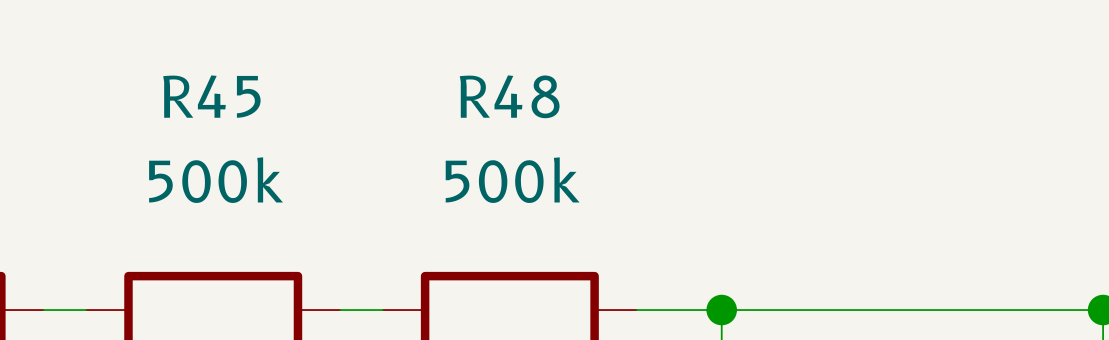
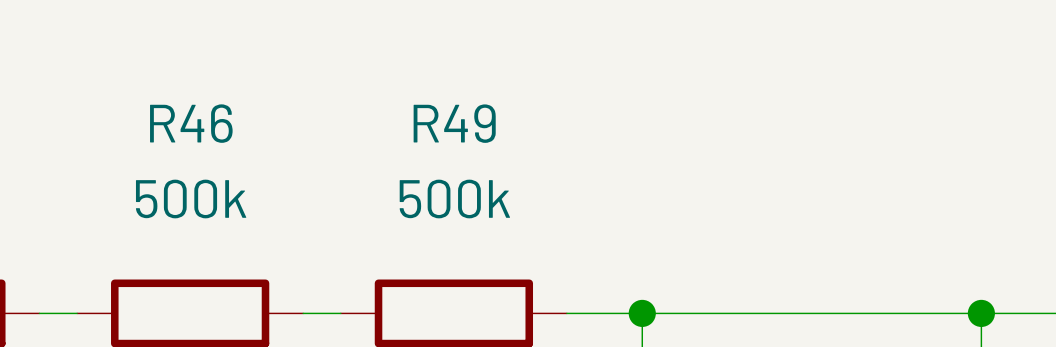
R45 name: R45 (211, 96) -> R46 (191, 123)
R48 name: R48 (509, 96) -> R49 (454, 123)

